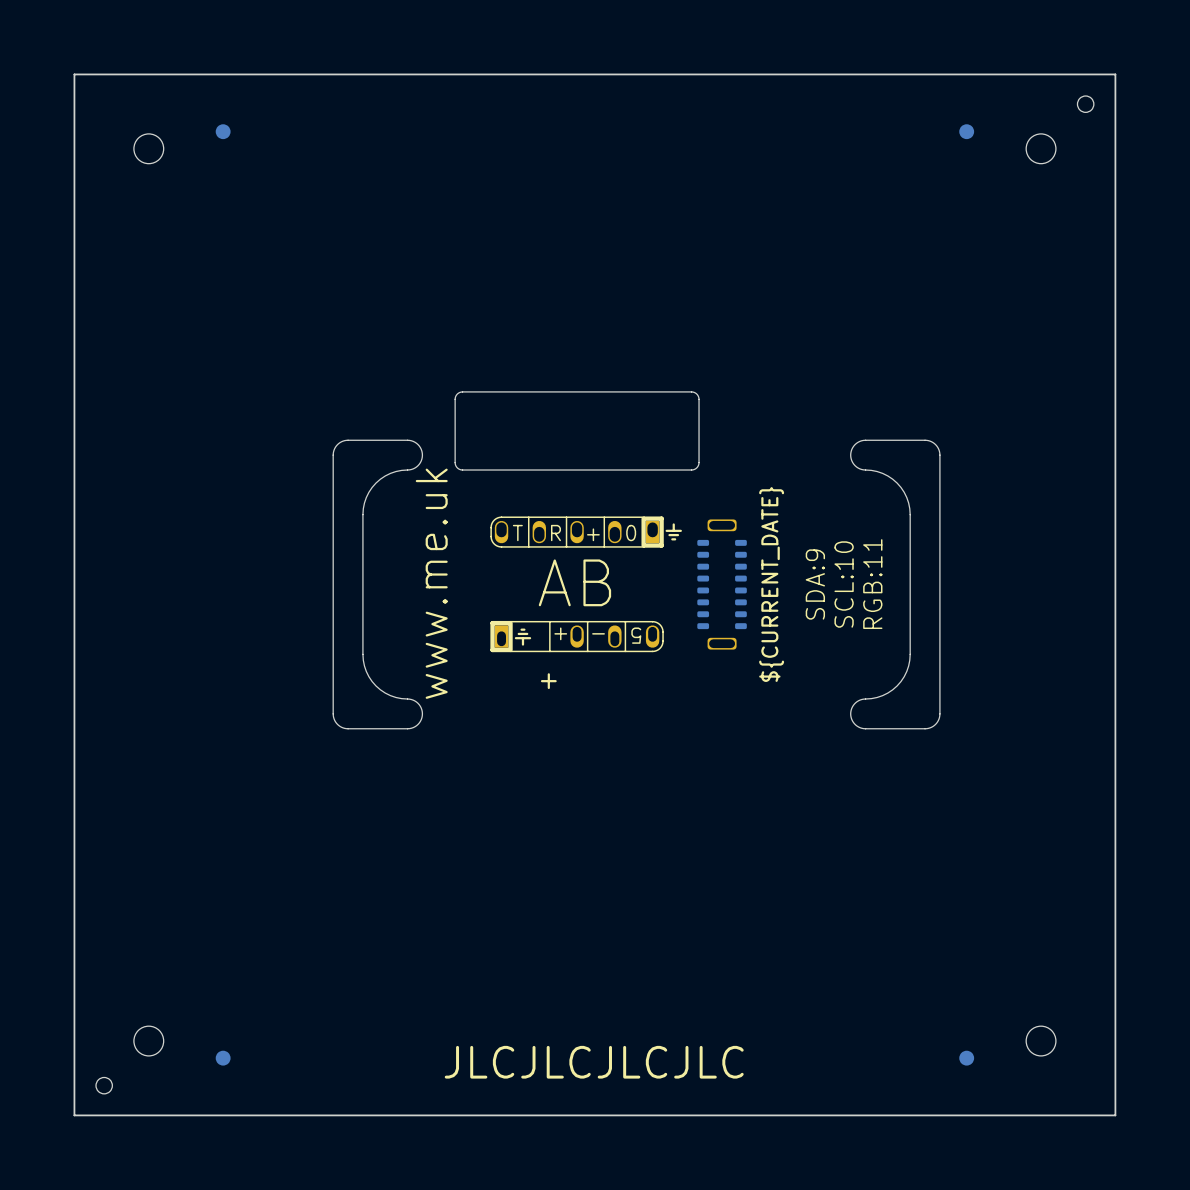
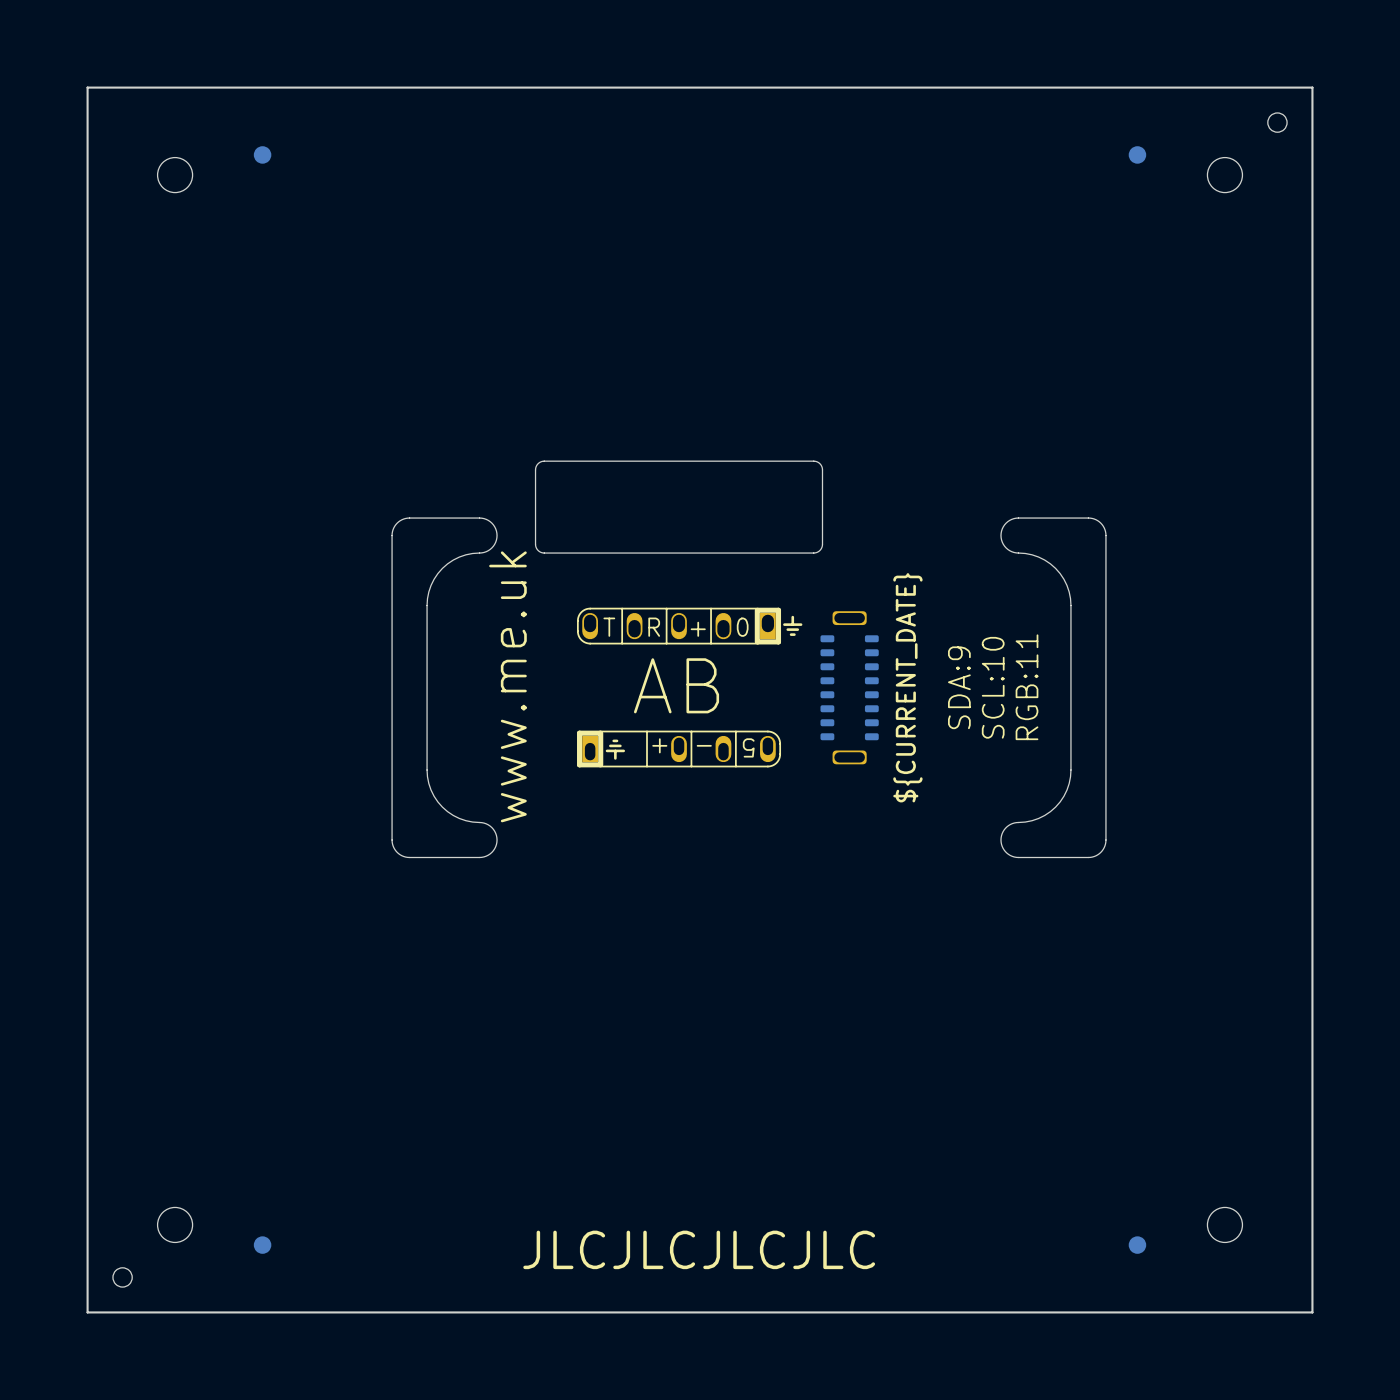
text: + (548, 681) -> none

